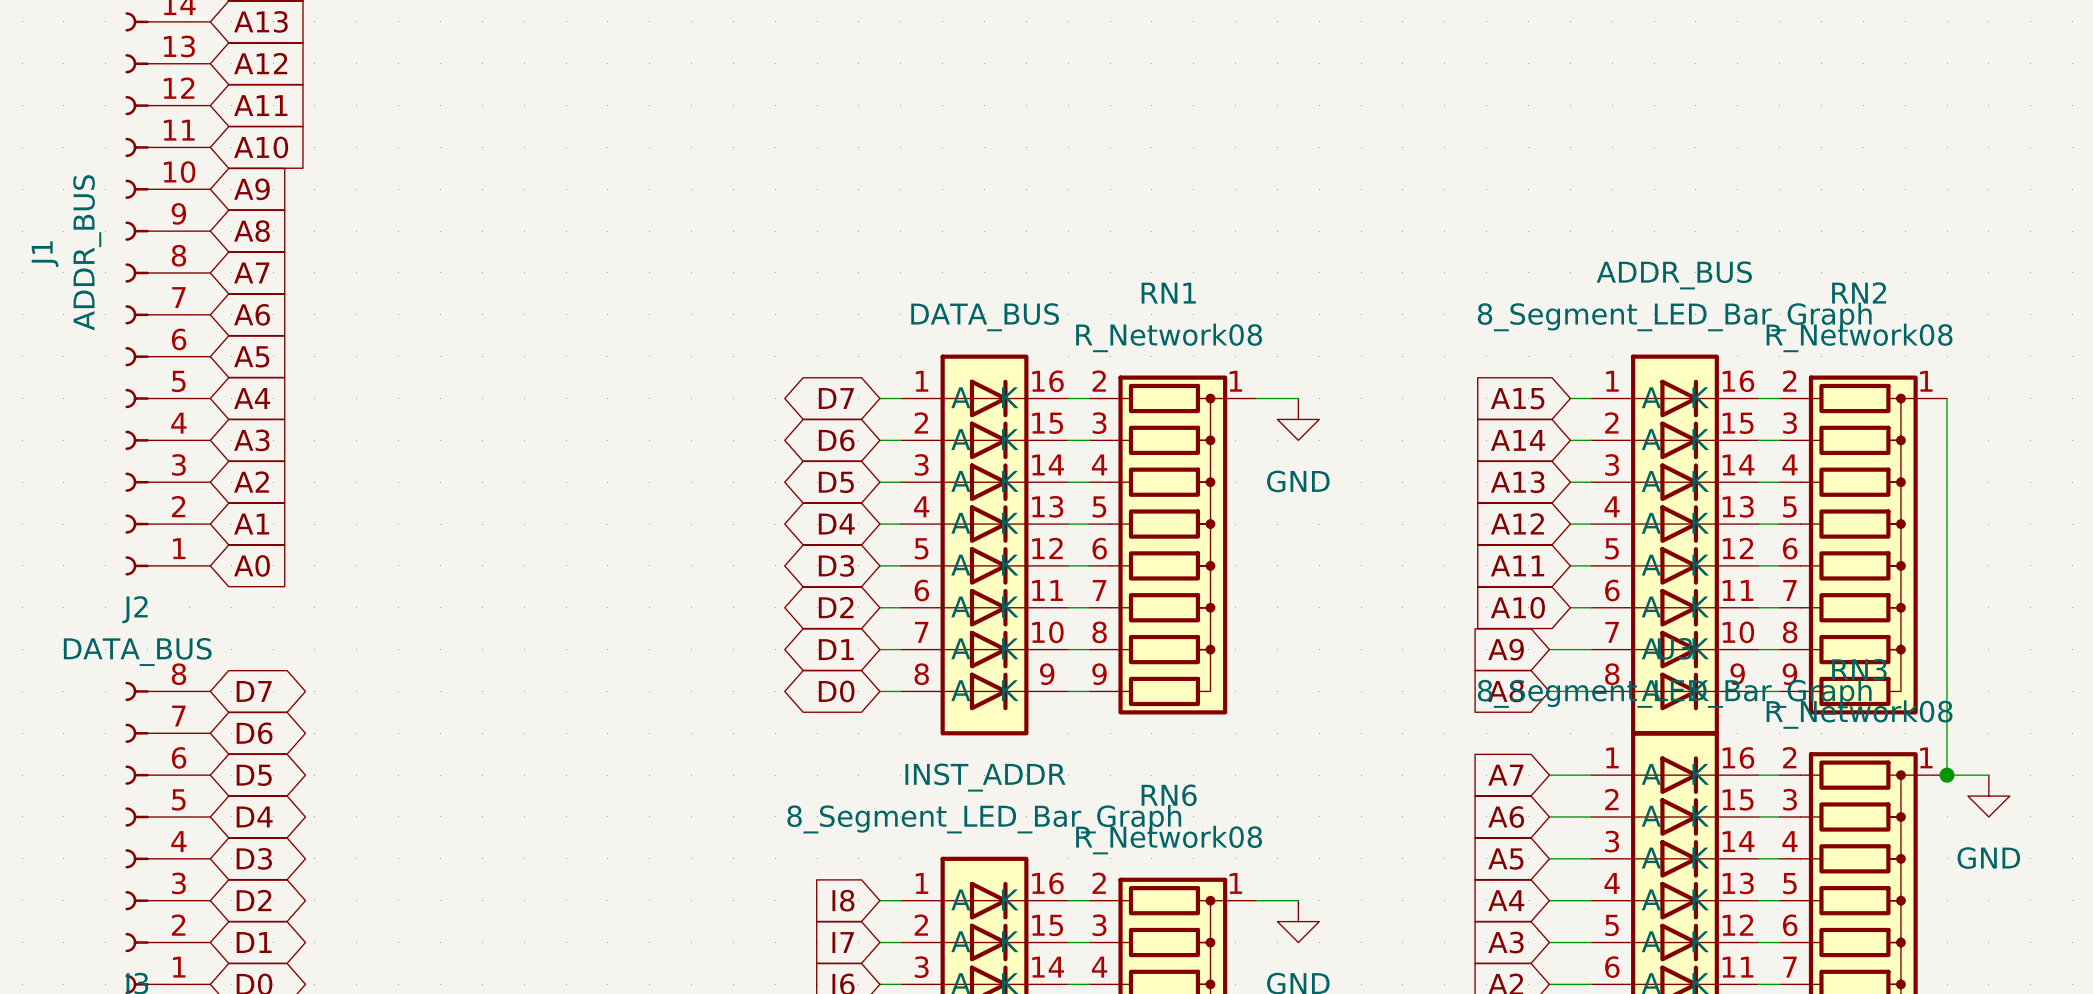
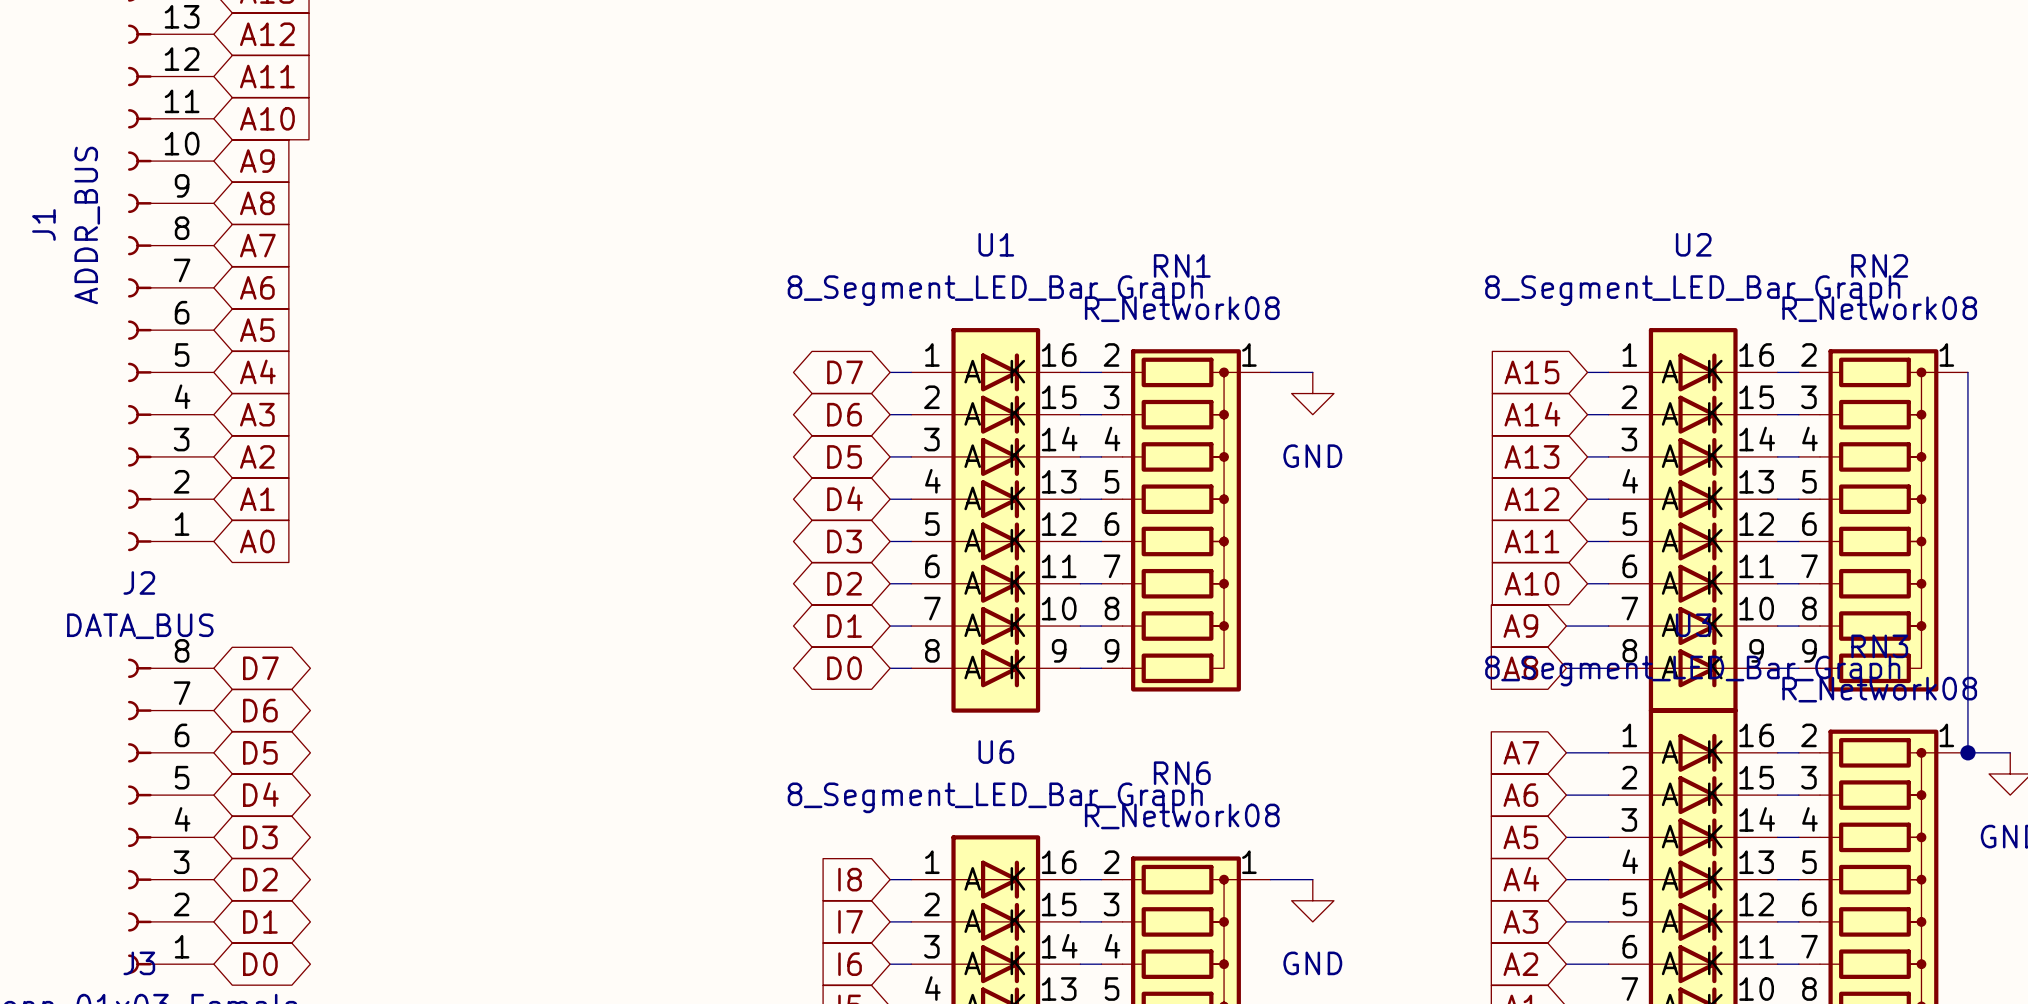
ADDR_BUS name: ADDR_BUS (1674, 275) -> U2 (1693, 244)
DATA_BUS value: none -> 8_Segment_LED_Bar_Graph (995, 290)
DATA_BUS name: DATA_BUS (985, 317) -> U1 (996, 244)
INST_ADDR name: INST_ADDR (985, 777) -> U6 (996, 752)

